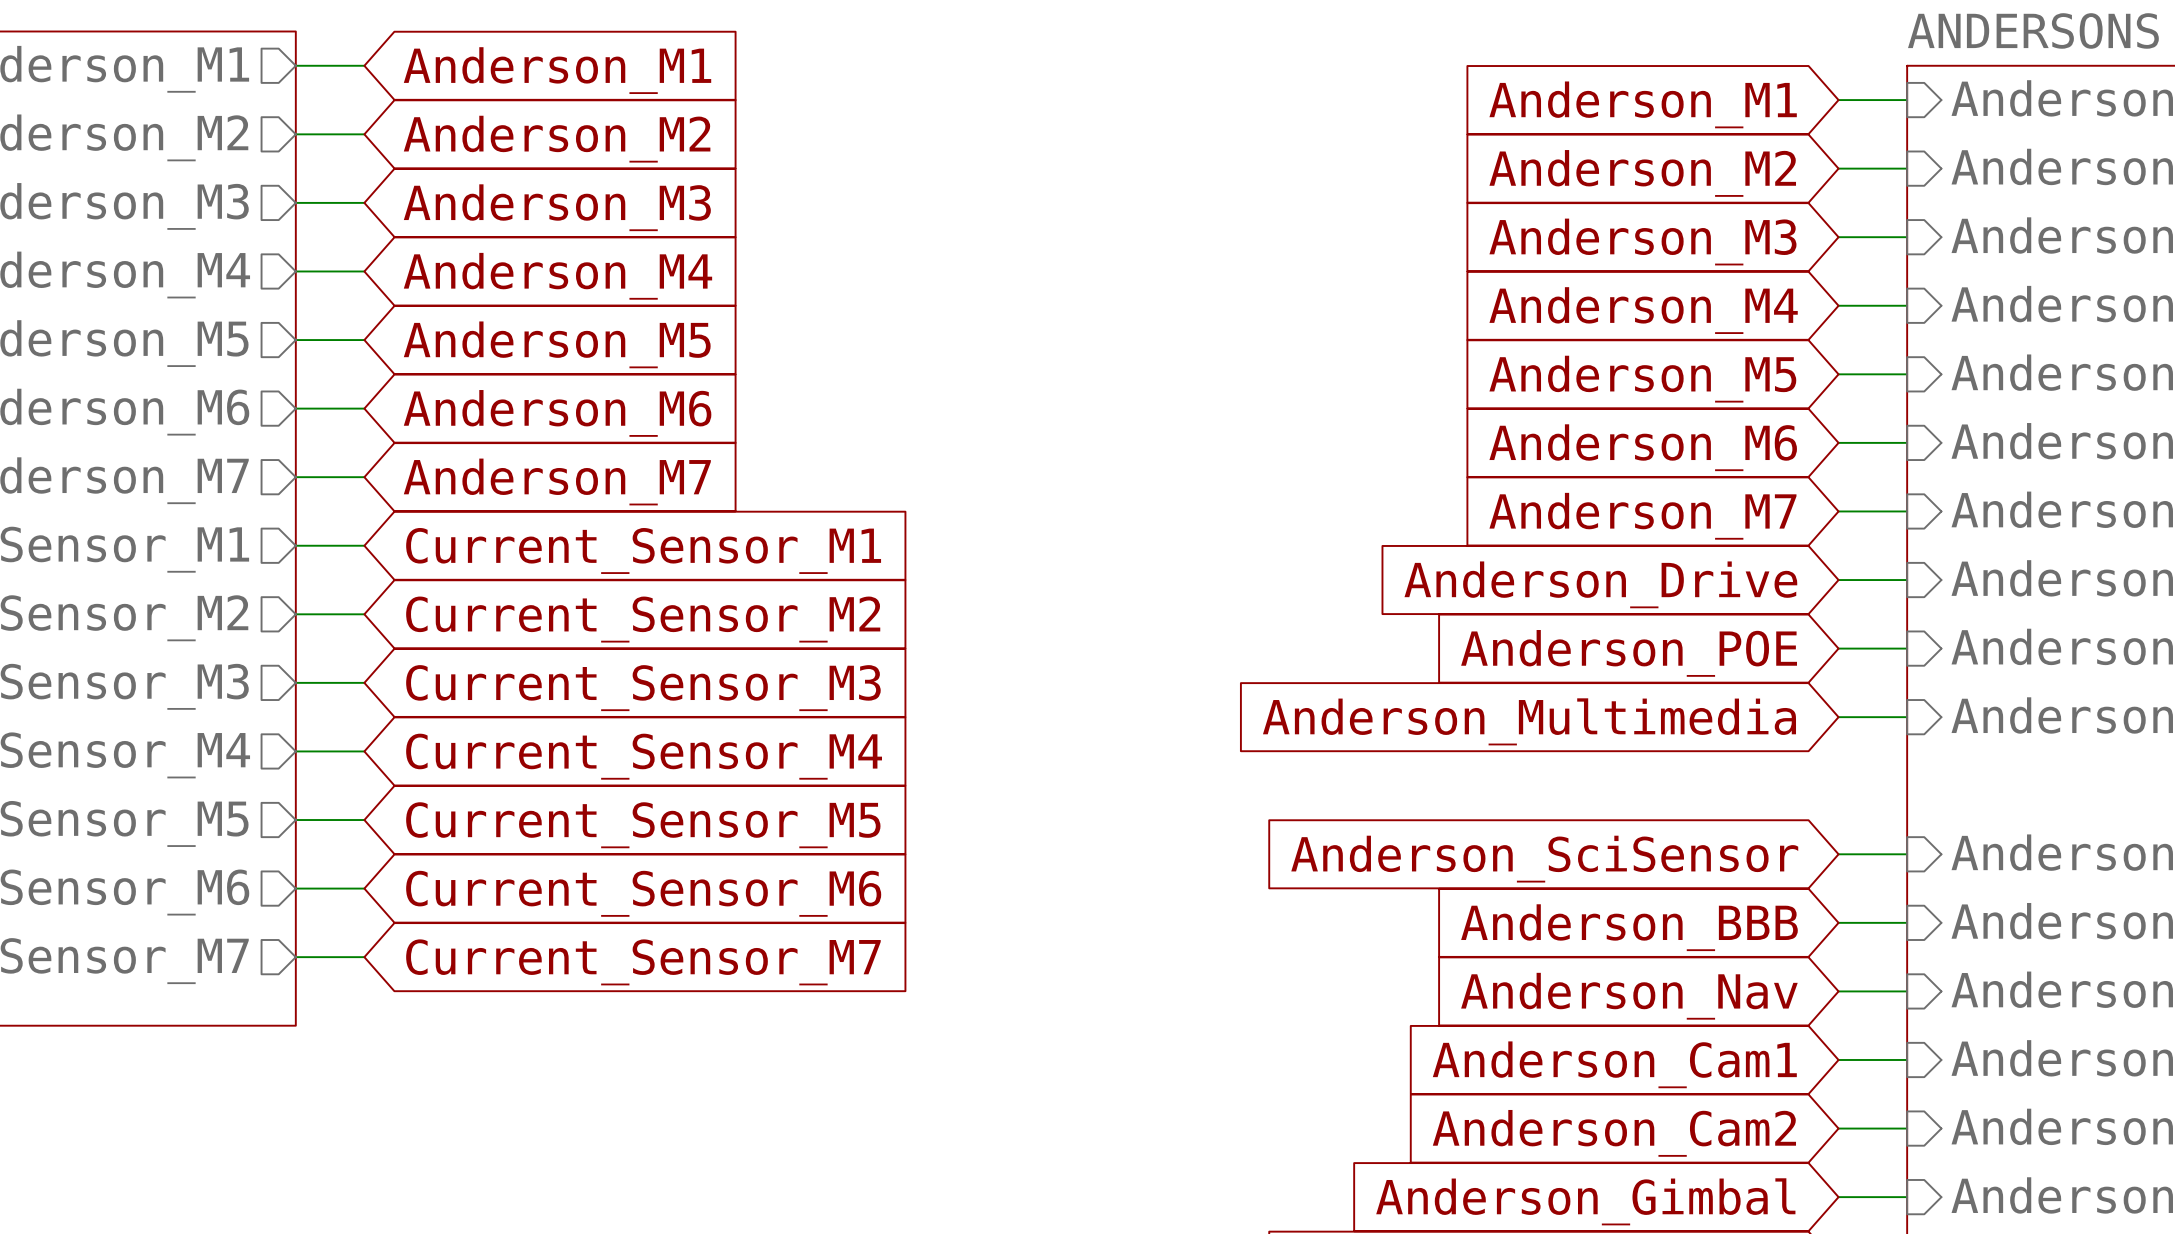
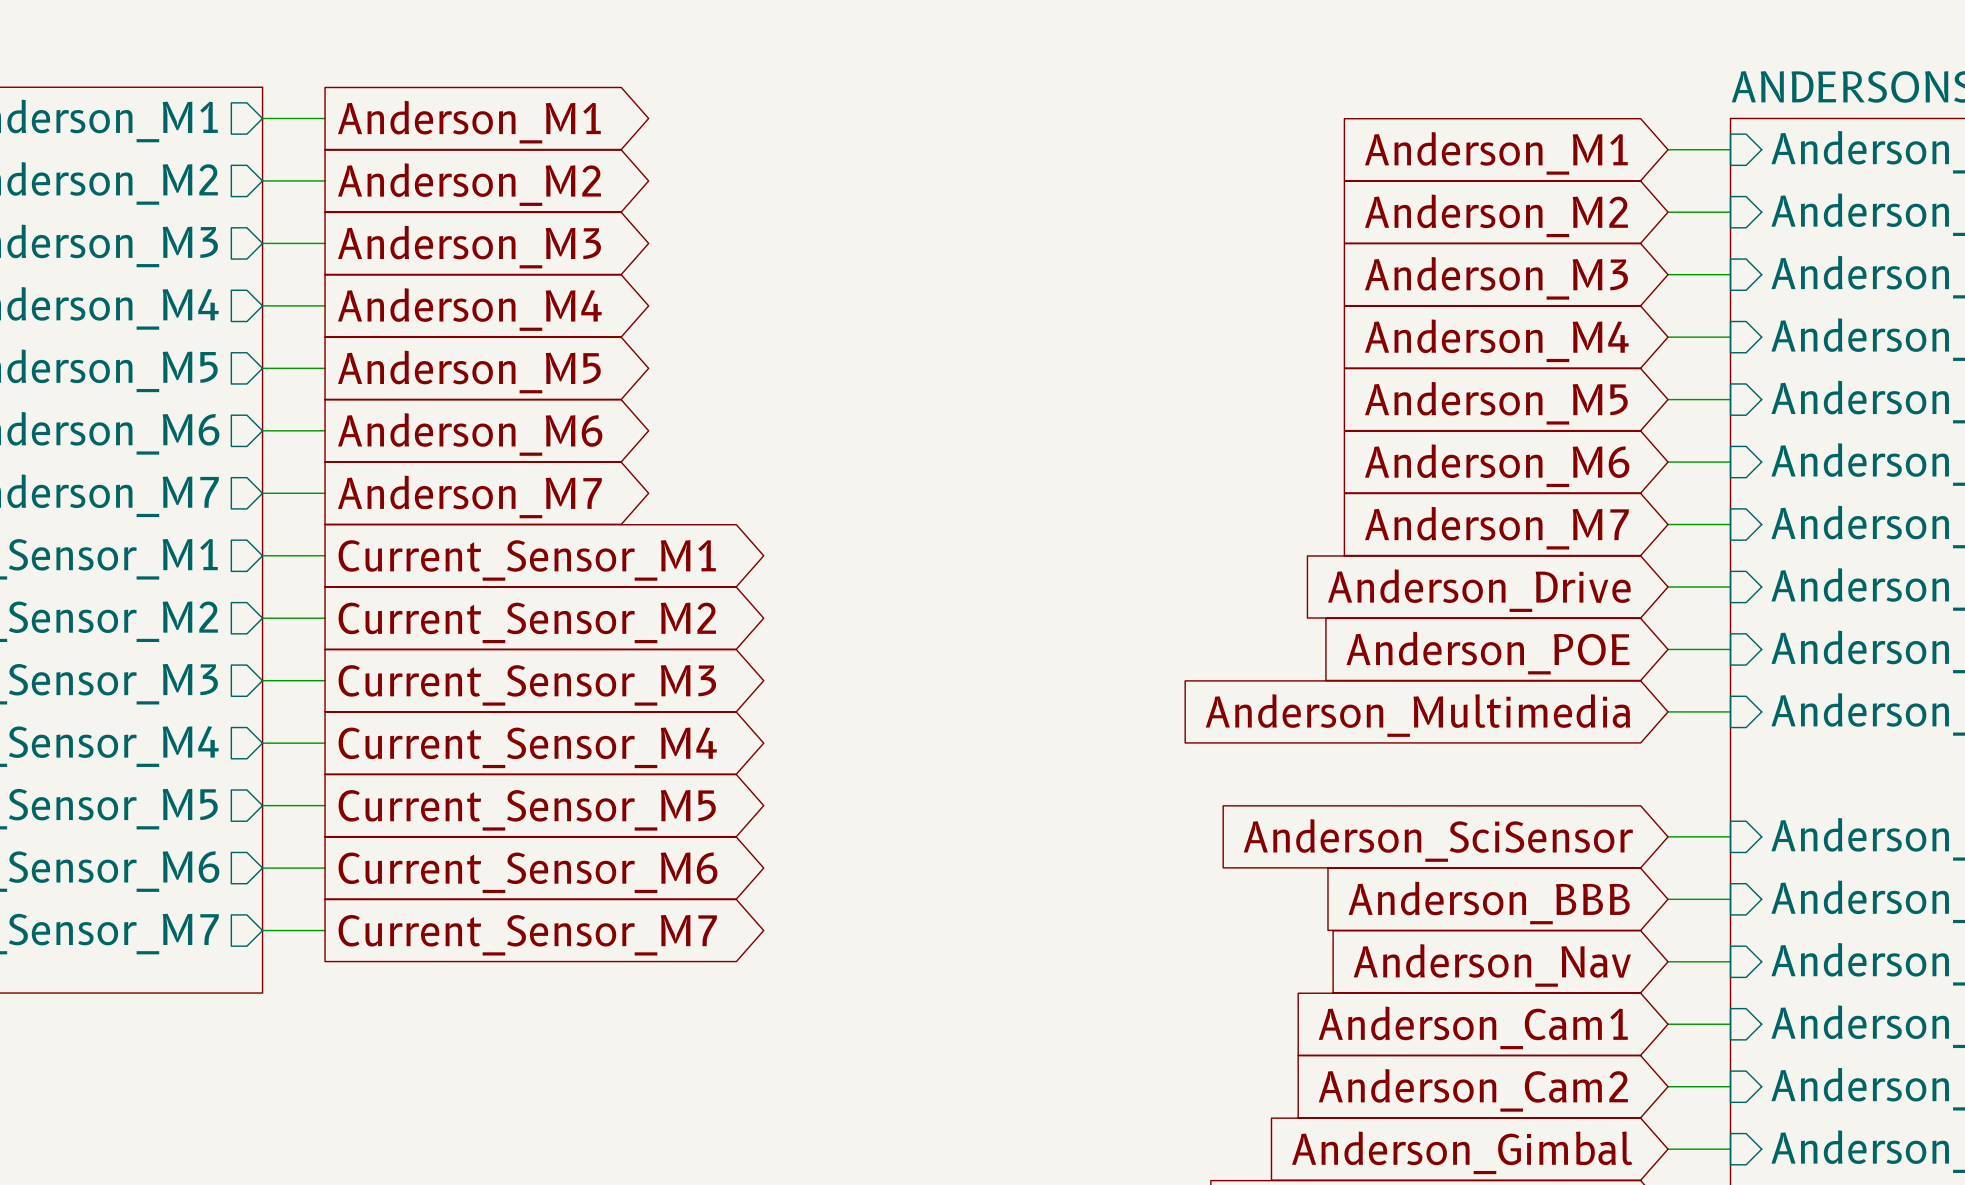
global label shape: input (557, 70) -> output (469, 122)
global label shape: input (557, 139) -> output (469, 184)
global label shape: input (557, 207) -> output (469, 247)
global label shape: input (557, 276) -> output (469, 309)
global label shape: input (557, 344) -> output (469, 372)
global label shape: input (557, 413) -> output (470, 434)
global label shape: input (557, 481) -> output (469, 496)
global label shape: input (643, 550) -> output (527, 560)
global label shape: input (643, 619) -> output (527, 622)
global label shape: input (643, 688) -> output (527, 685)
global label shape: input (644, 756) -> output (527, 747)
global label shape: input (643, 825) -> output (527, 810)
global label shape: input (643, 893) -> output (528, 872)
global label shape: input (643, 962) -> output (527, 935)

